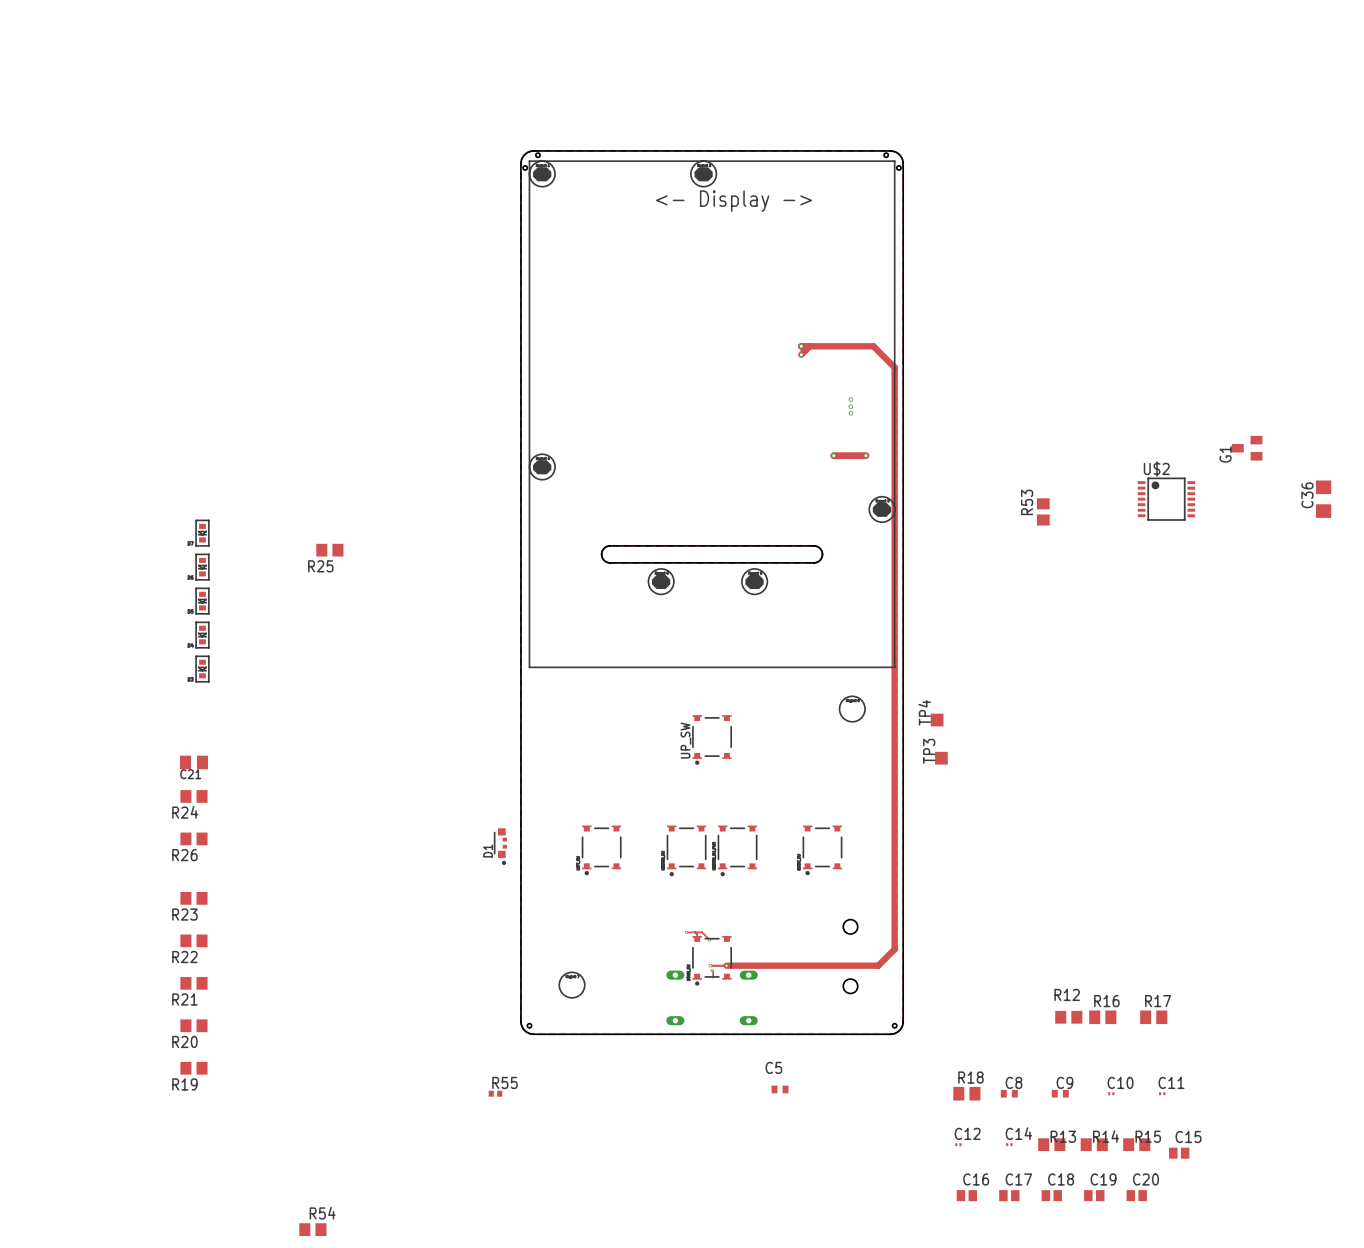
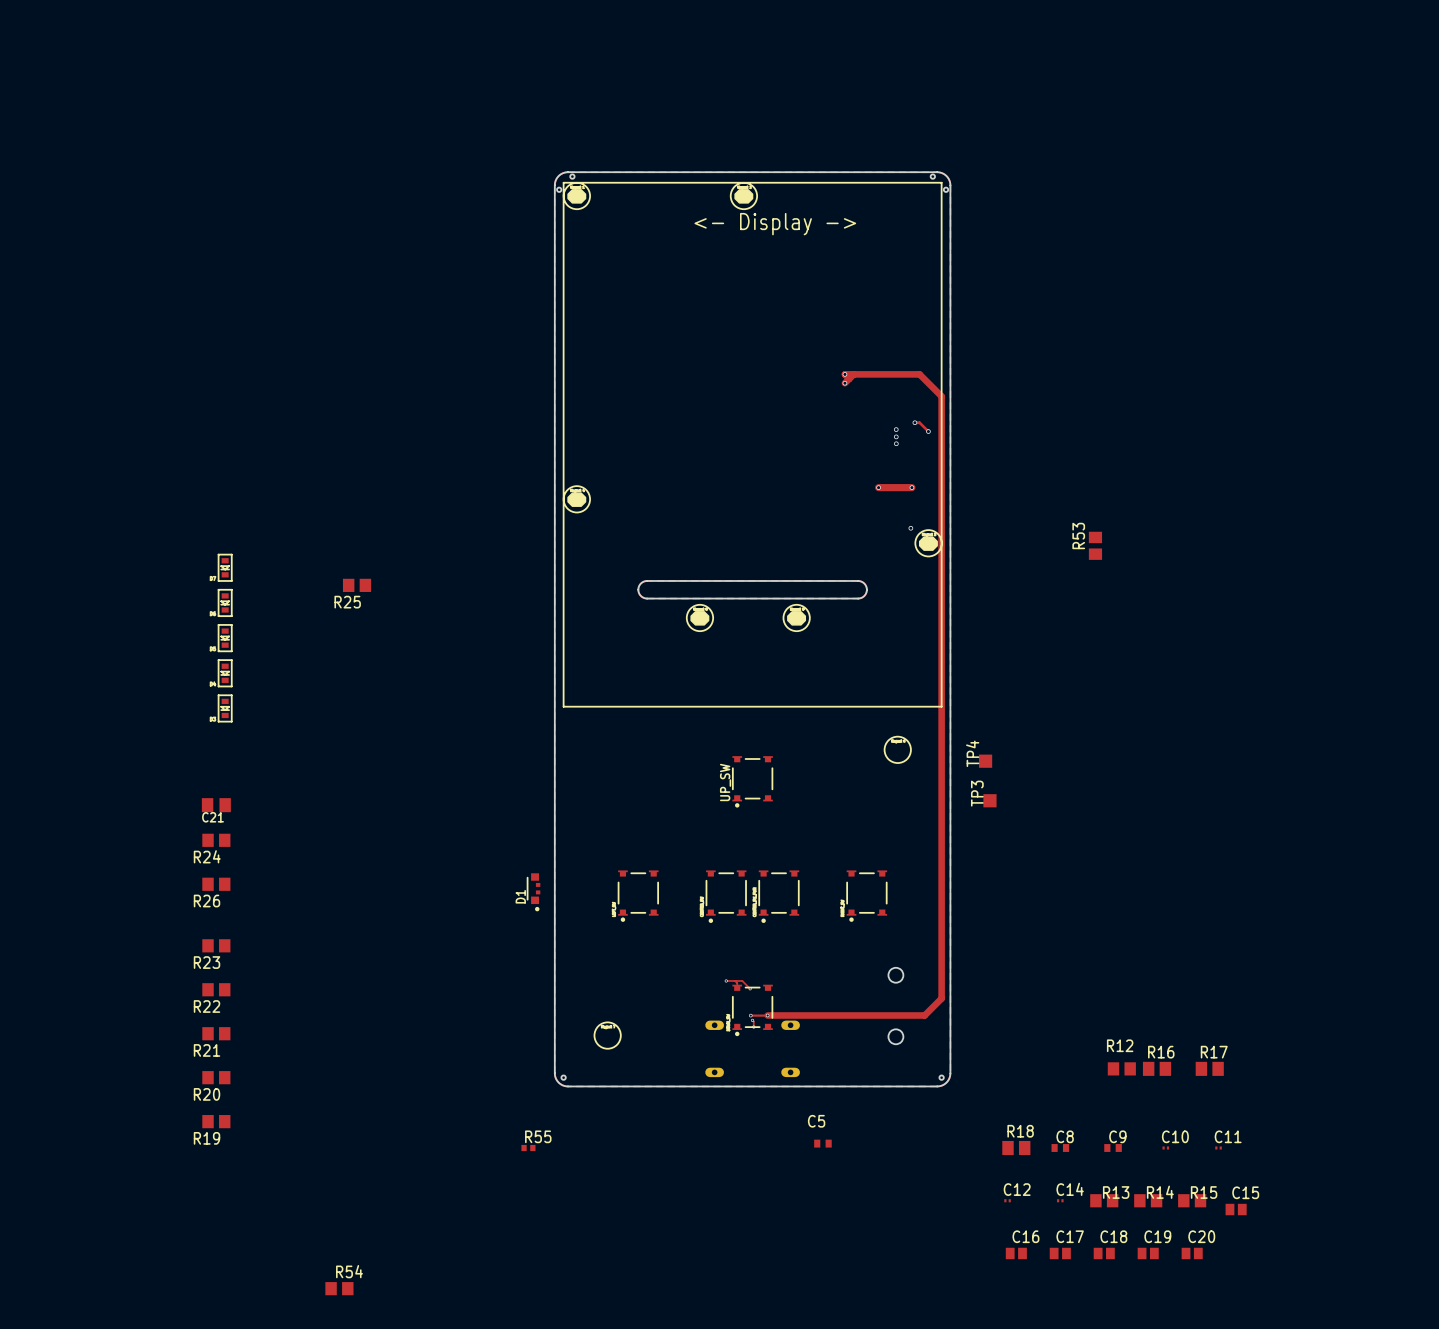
track: none -> (914, 422) (919, 422) (928, 431)
via: none -> (914, 422)
via: none -> (928, 431)
G1: (1247, 448) -> none
via: none -> (910, 528)
U$2: (1166, 499) -> none
C36: (1323, 499) -> none

